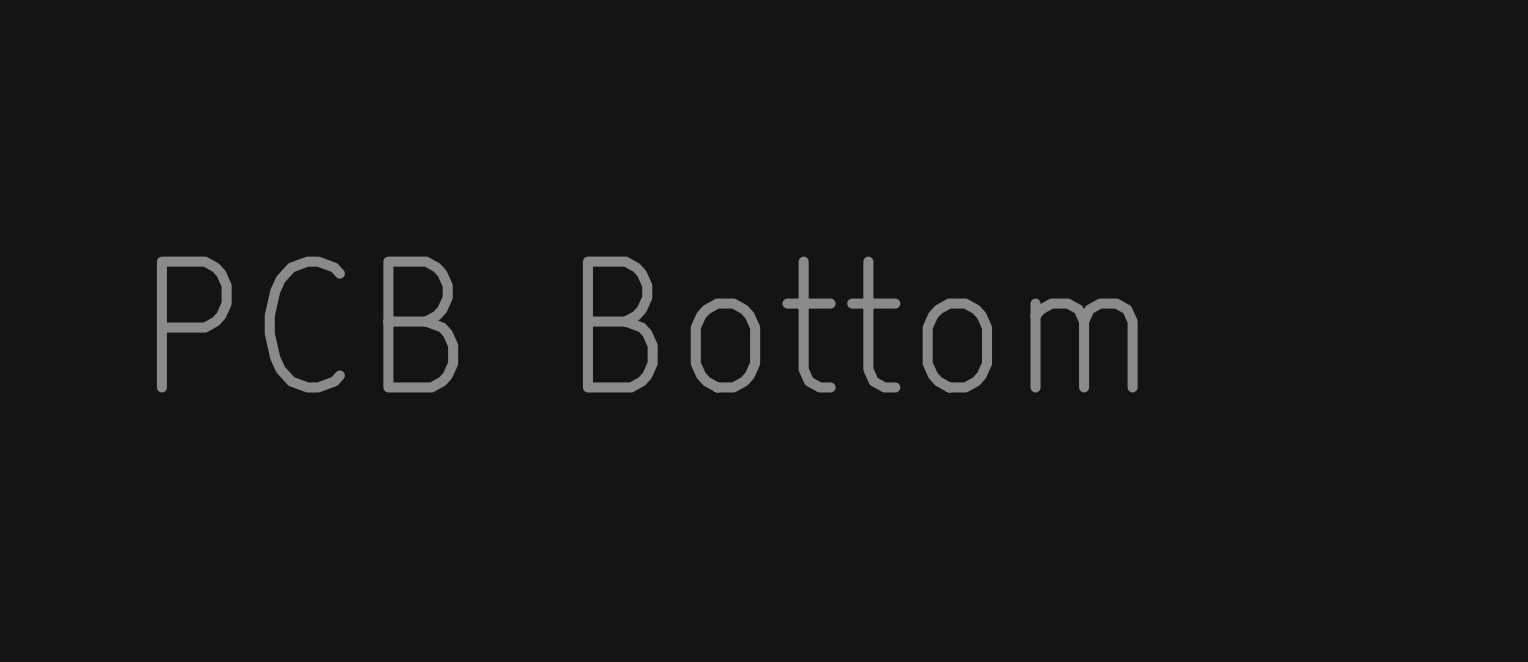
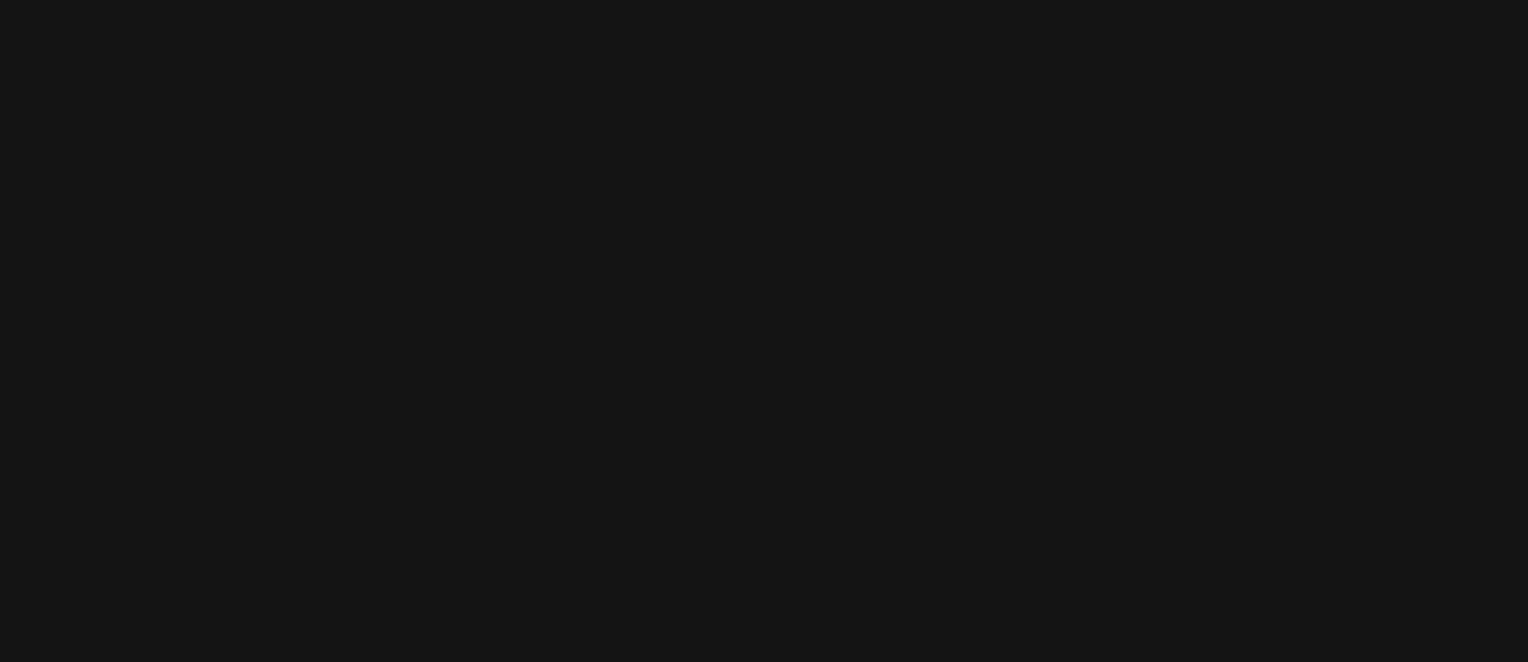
text: PCB Bottom (647, 324) -> none

